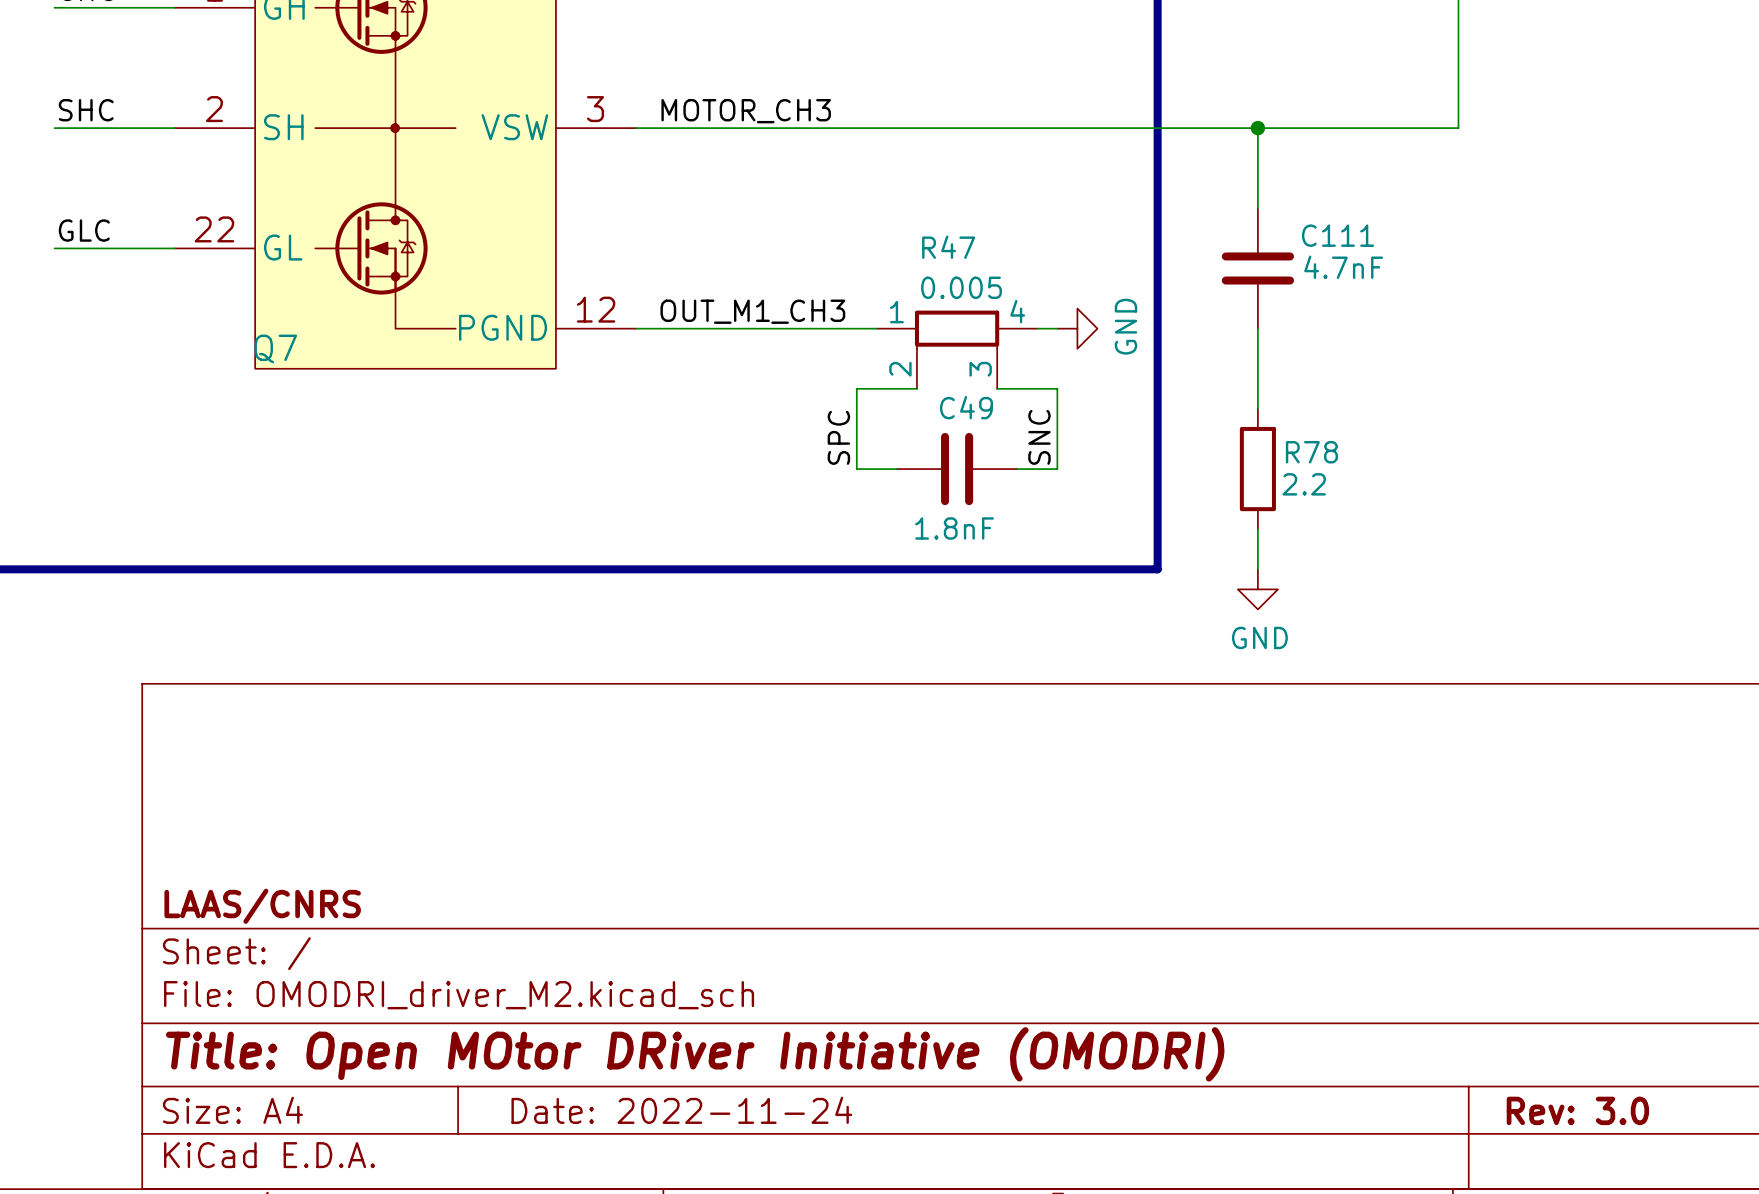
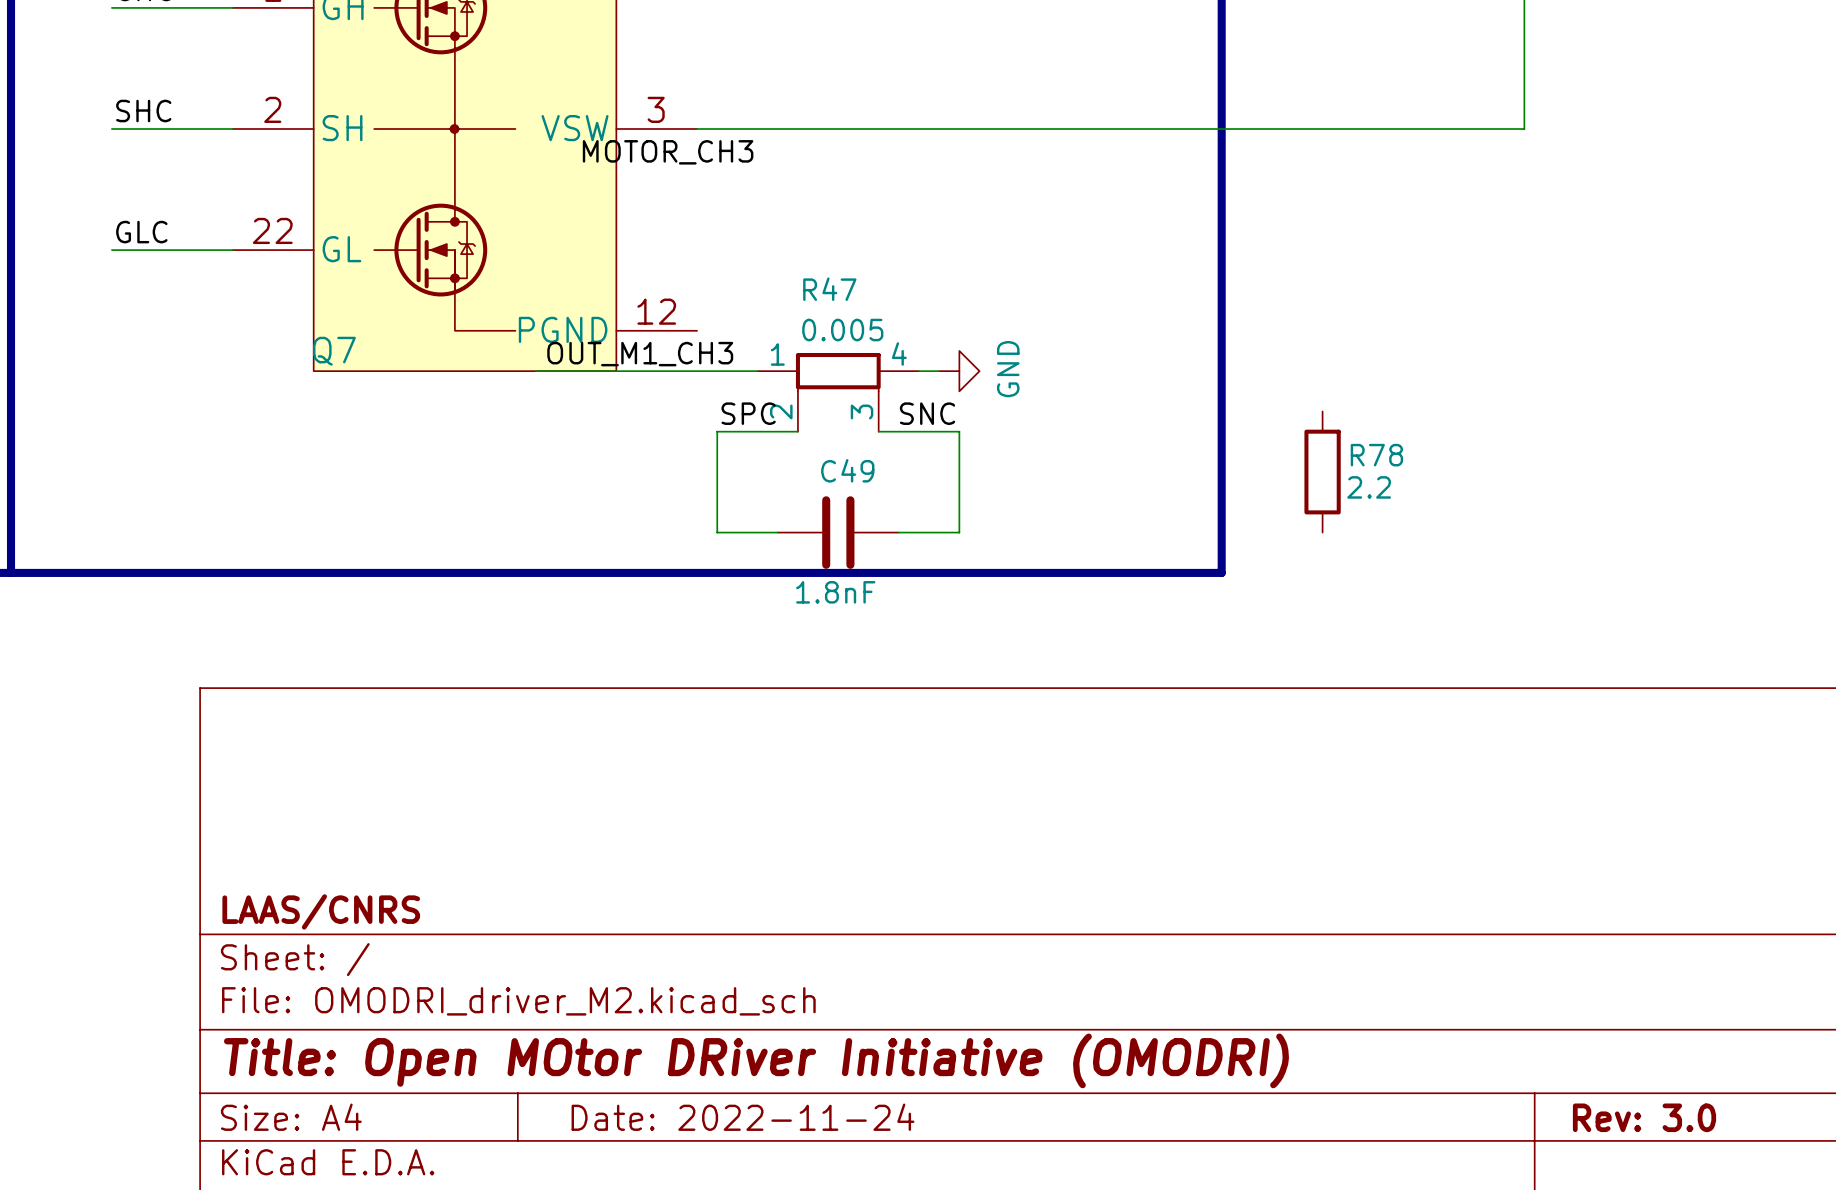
label position: MOTOR_CH3 (746, 111) -> MOTOR_CH3 (668, 152)
wire: (1257, 128) (1257, 208) -> none
junction: (1257, 128) -> none
C111: 4.7nF (1257, 268) -> none
label position: OUT_M1_CH3 (752, 311) -> OUT_M1_CH3 (640, 354)
wire: (636, 328) (876, 328) -> none
wire: (1037, 328) (1057, 328) -> (919, 371) (939, 371)
power symbol position: GND (1077, 328) -> GND (959, 371)
wire: (1257, 328) (1257, 408) -> none
R47 position: (957, 349) -> (838, 392)
wire: none -> (535, 371) (757, 371)
wire: (916, 388) (856, 388) (856, 469) (896, 469) -> none
wire: (997, 388) (1057, 388) (1057, 469) (1017, 469) -> none
wire: none -> (797, 431) (717, 431) (717, 532) (777, 532)
wire: none -> (878, 431) (959, 431) (959, 532) (898, 532)
label rotation: 0° (838, 437) -> 90° clockwise (748, 413)
label position: SPC (838, 437) -> SPC (748, 413)
label rotation: 0° (1039, 437) -> 90° clockwise (927, 413)
label position: SNC (1039, 437) -> SNC (927, 413)
C49 position: (957, 469) -> (838, 532)
wire: (1257, 529) (1257, 569) -> none
power symbol: GND (1257, 589) -> none

